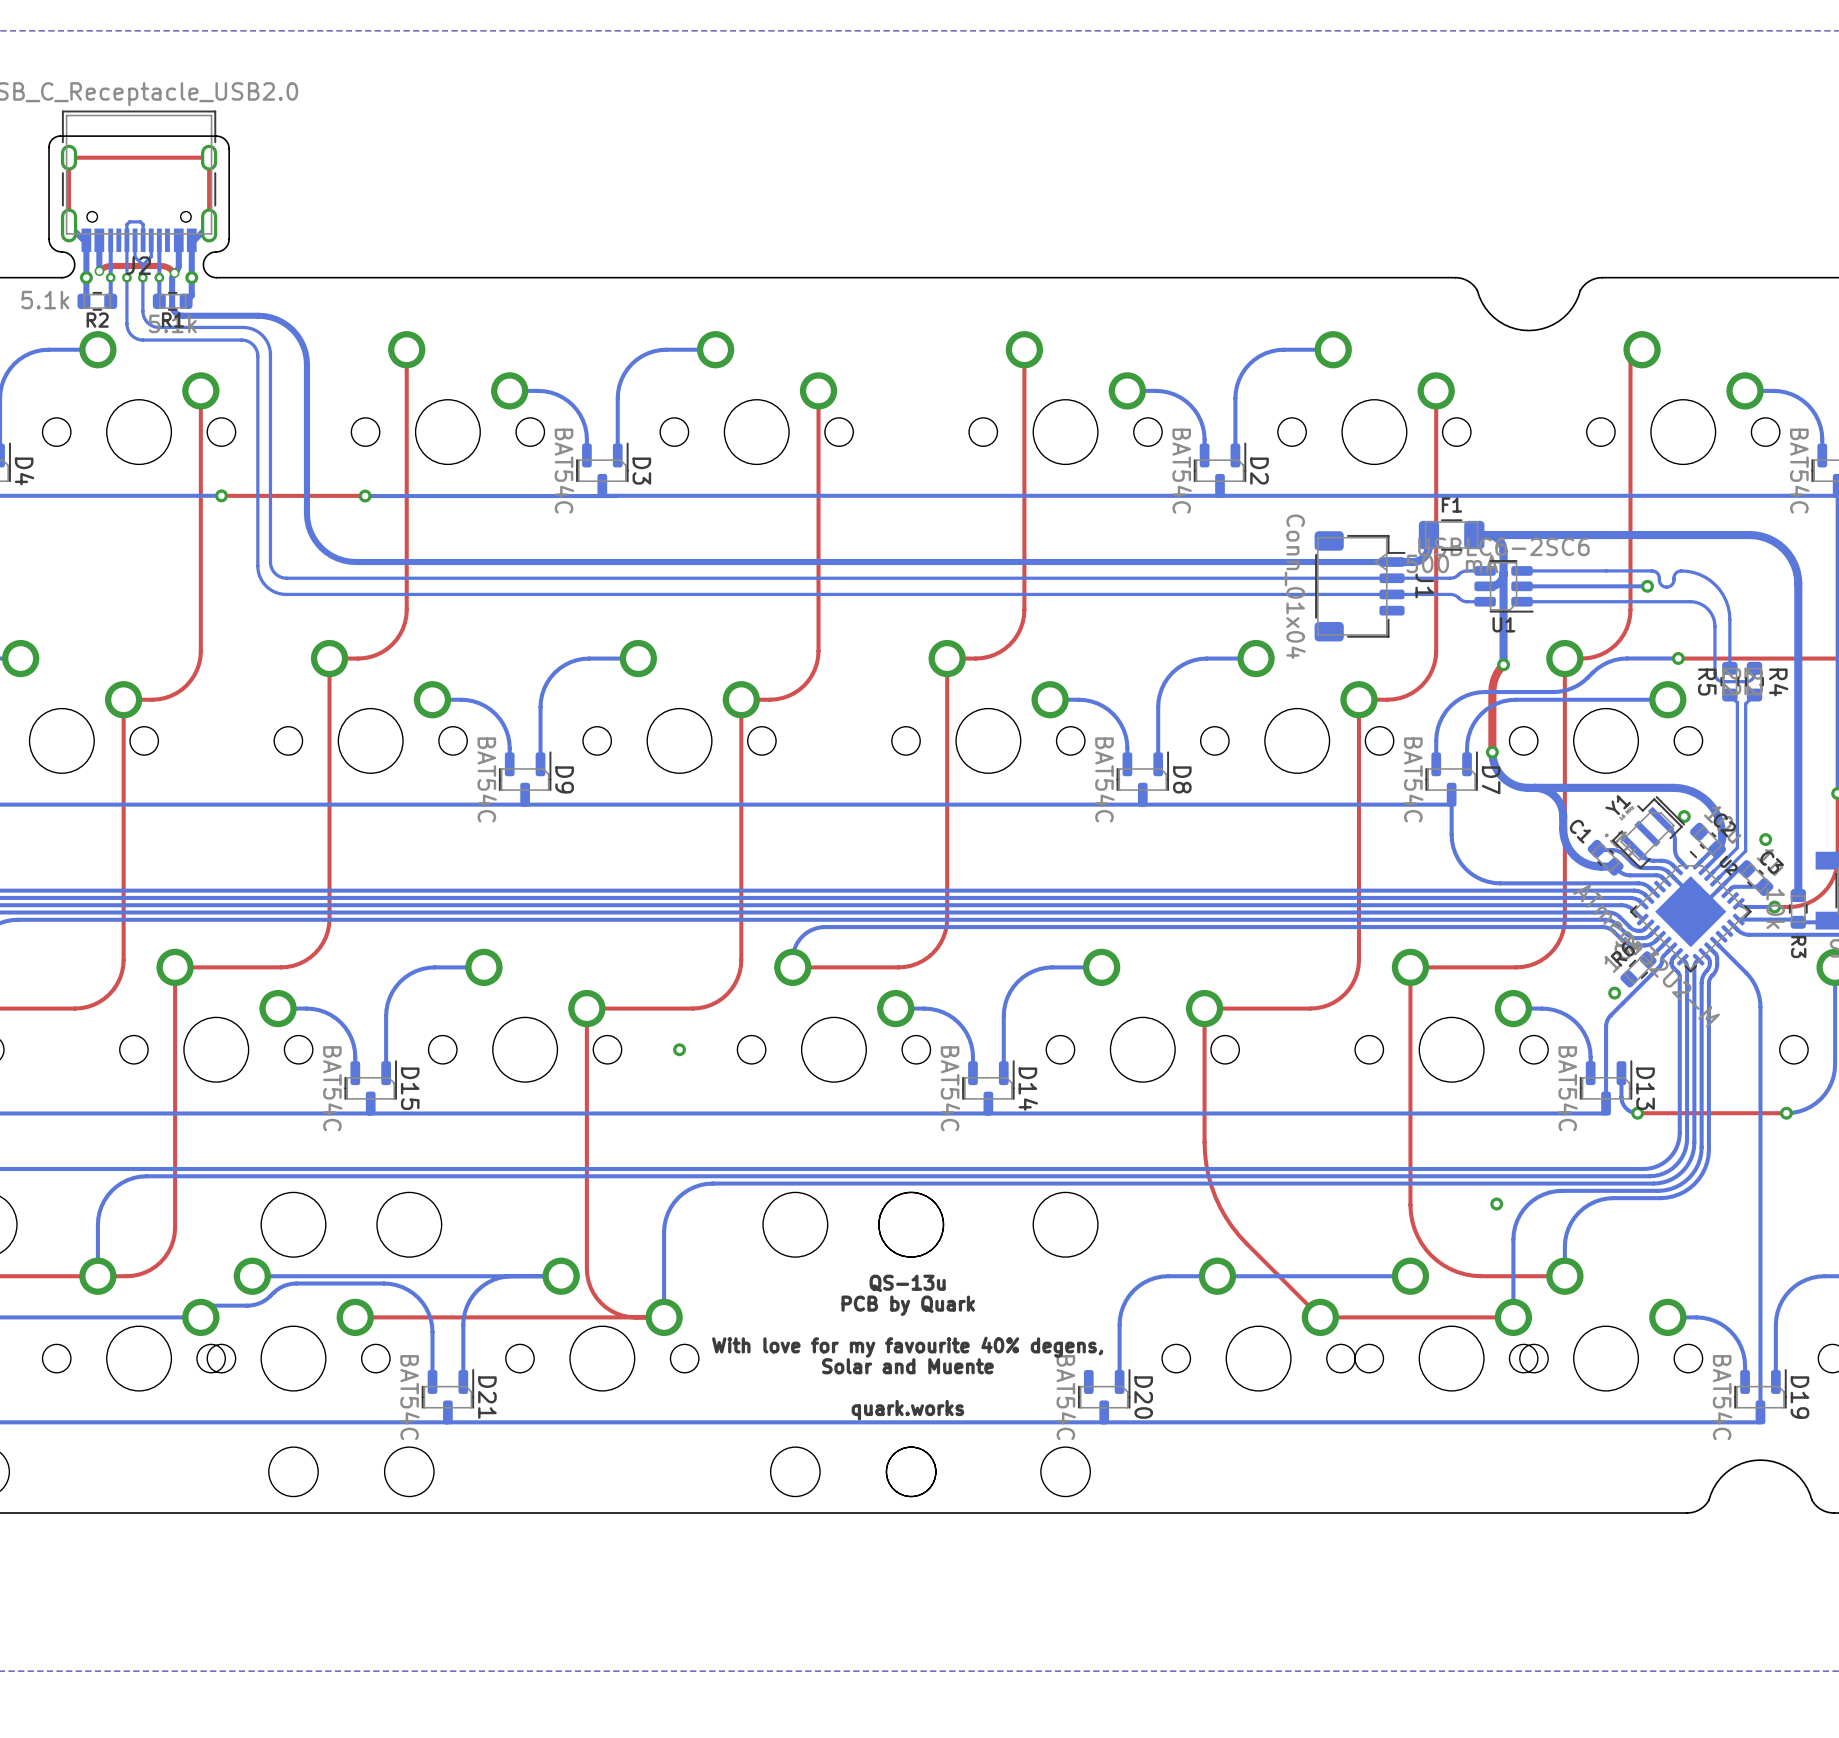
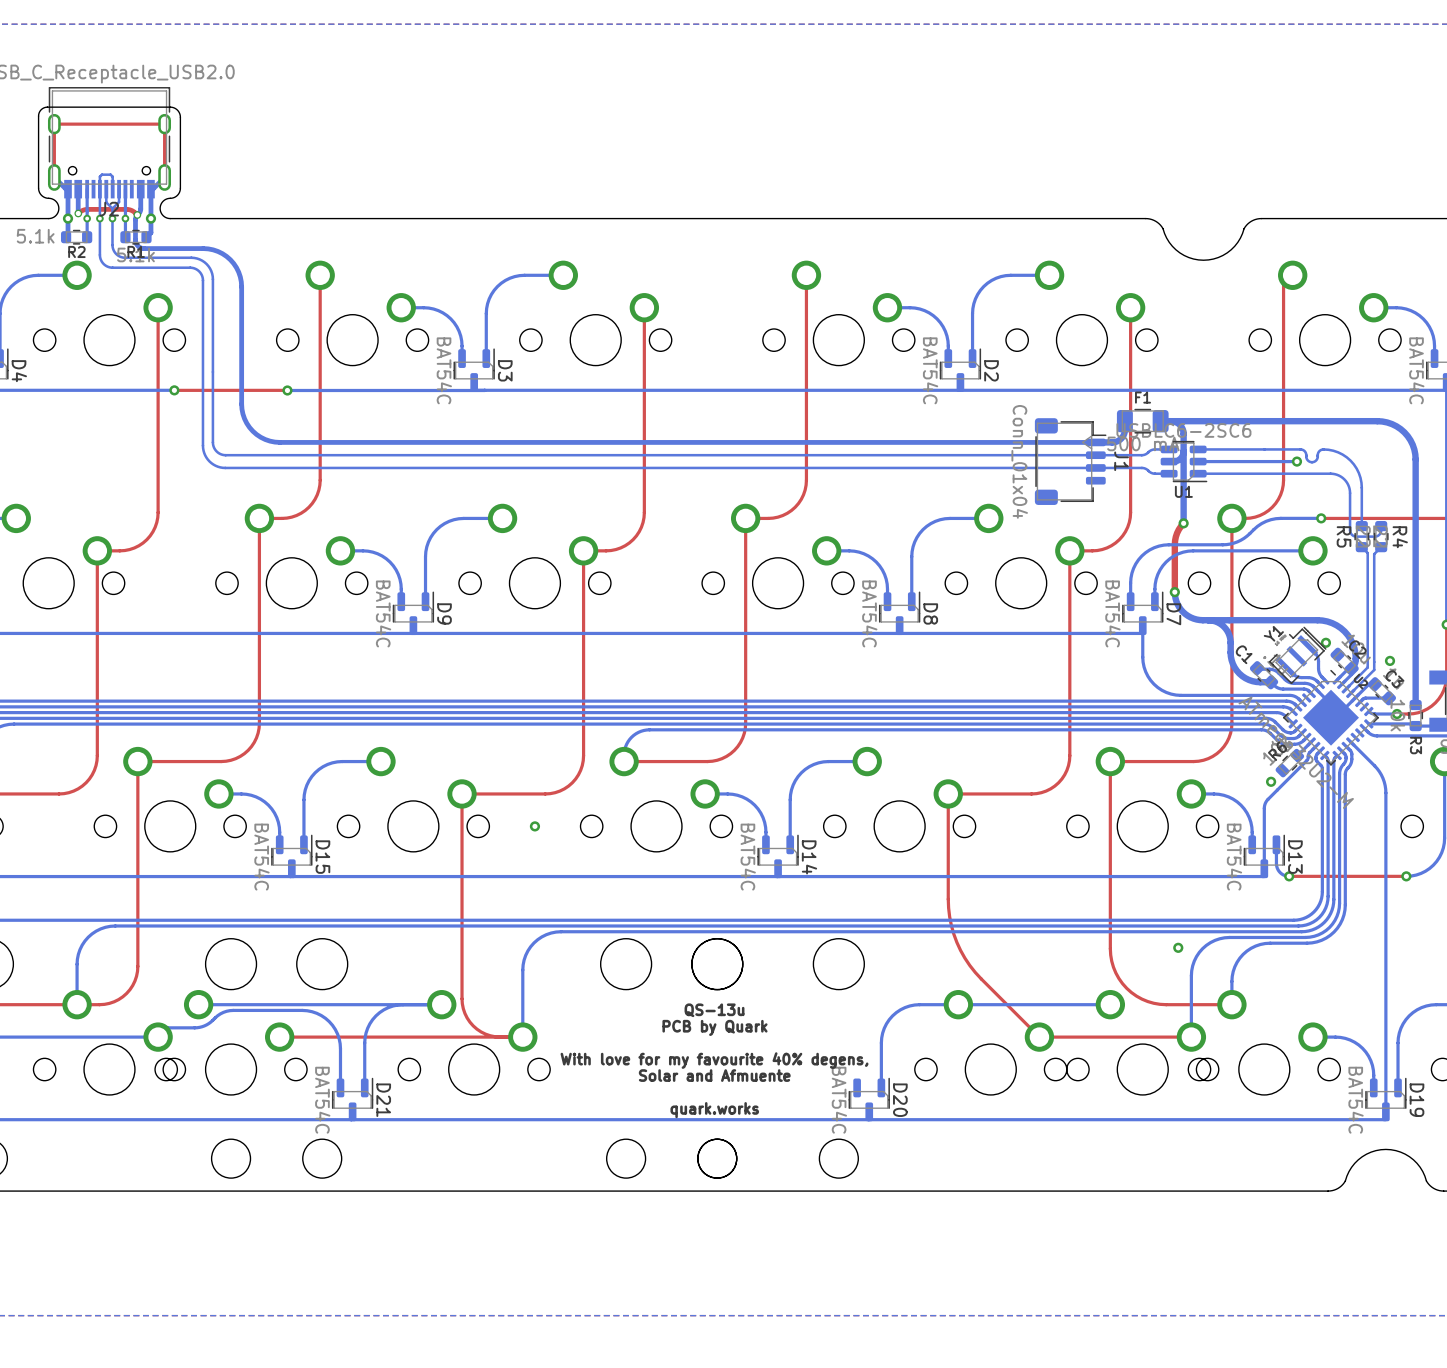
text: Solar and Muente (907, 1366) -> Solar and Afmuente (714, 1075)

